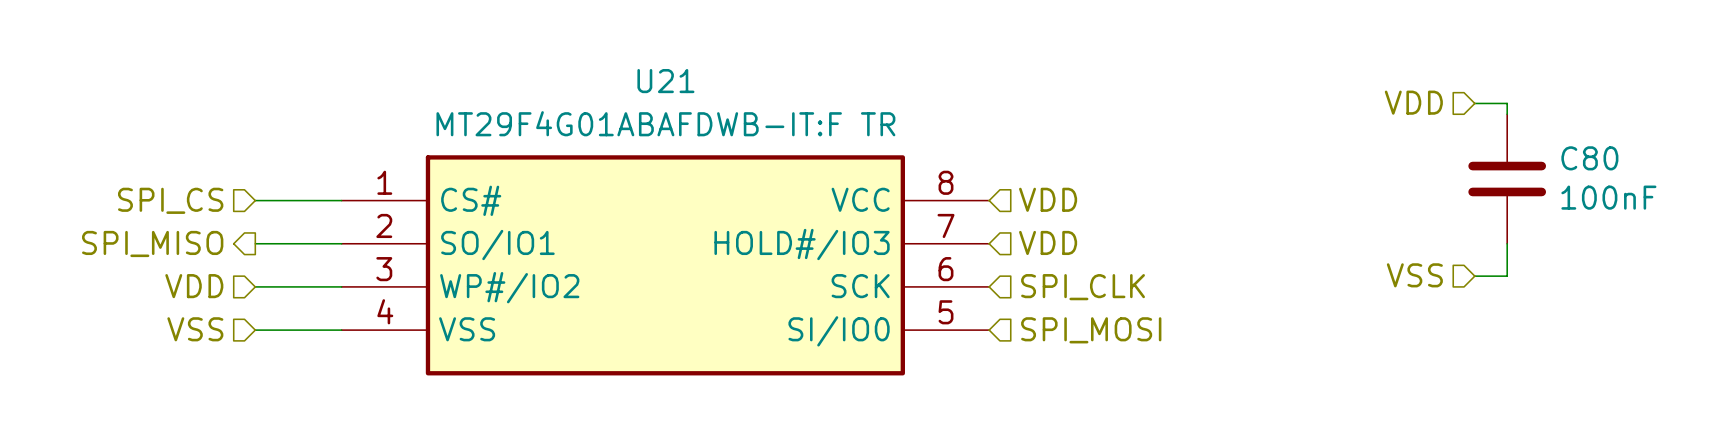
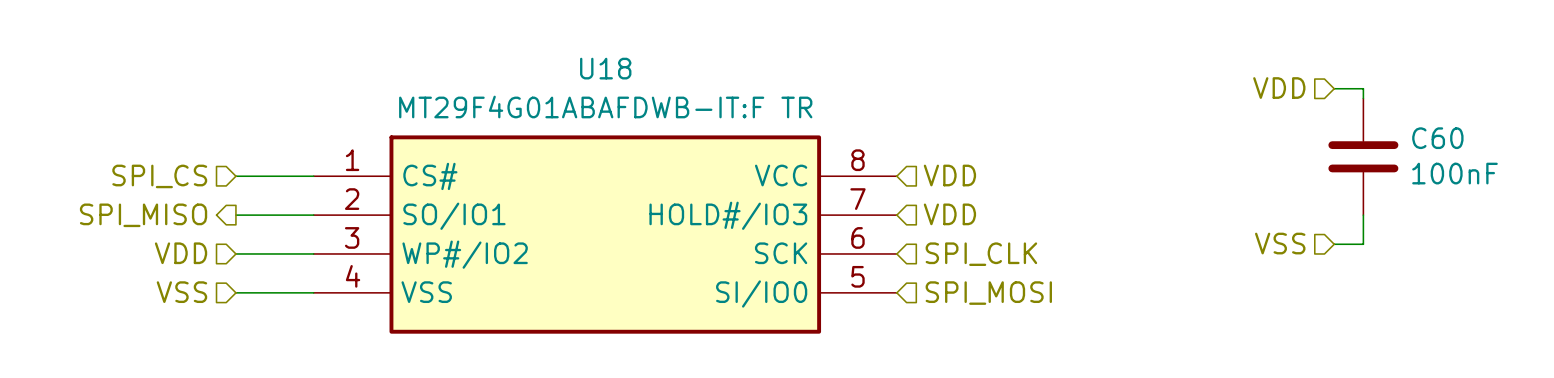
U21 name: U21 (665, 81) -> U18 (605, 68)
C80 name: C80 (1589, 158) -> C60 (1437, 138)

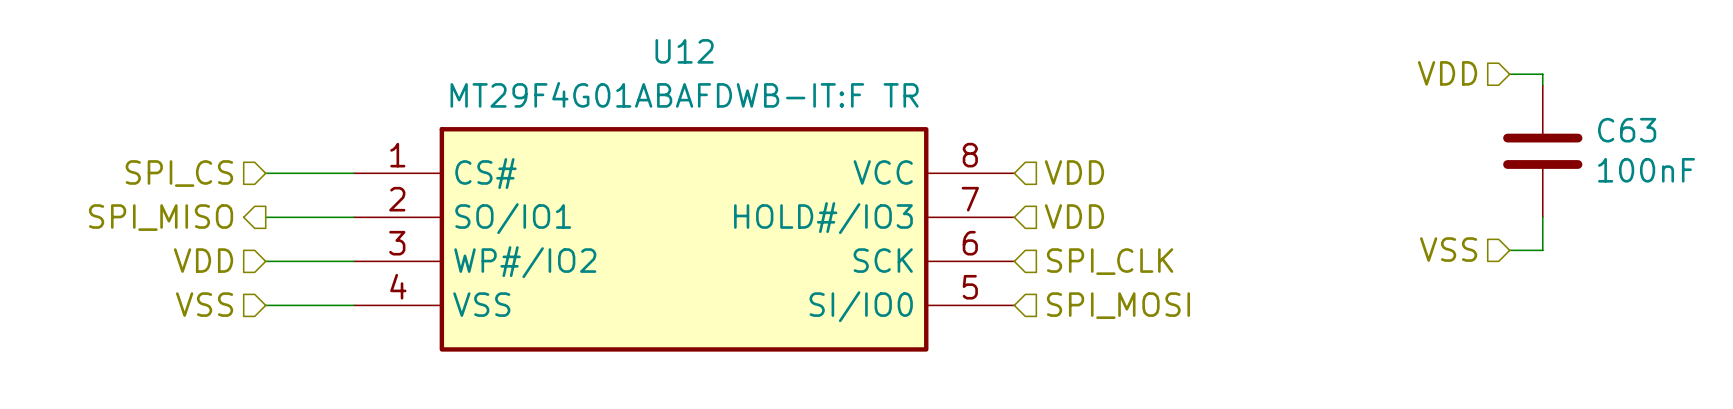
U18 name: U18 (605, 68) -> U12 (684, 51)
C60 name: C60 (1437, 138) -> C63 (1627, 130)

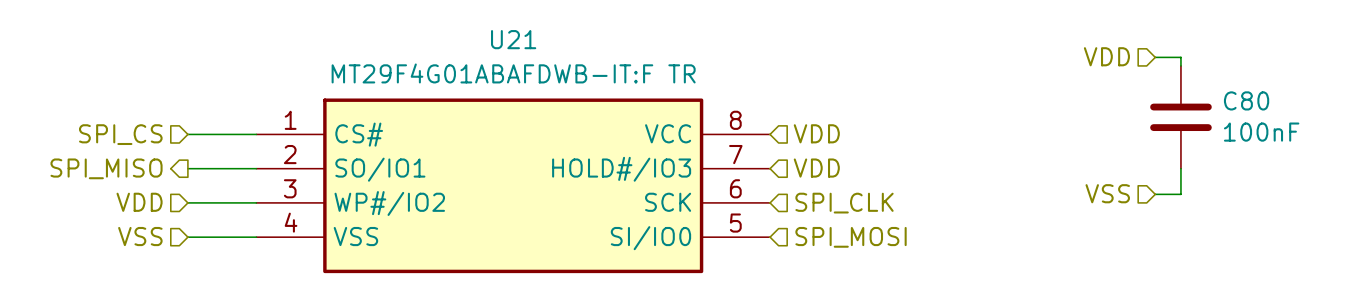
U12 name: U12 (684, 51) -> U21 (513, 39)
C63 name: C63 (1627, 130) -> C80 (1246, 100)

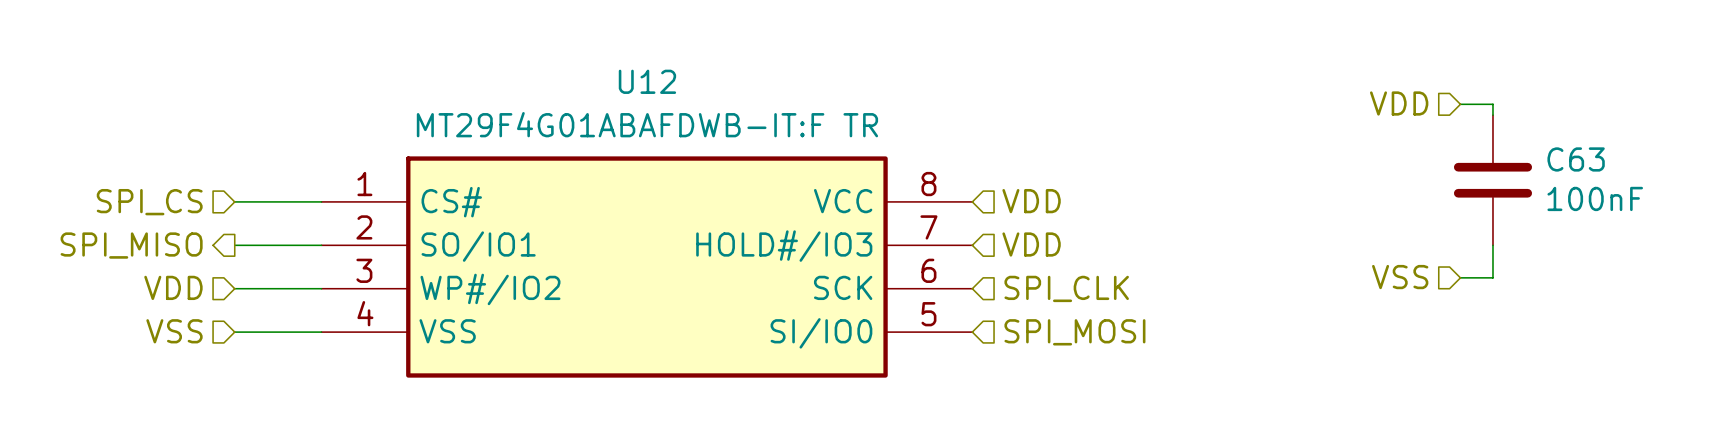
U21 name: U21 (513, 39) -> U12 (647, 81)
C80 name: C80 (1246, 100) -> C63 (1576, 159)

